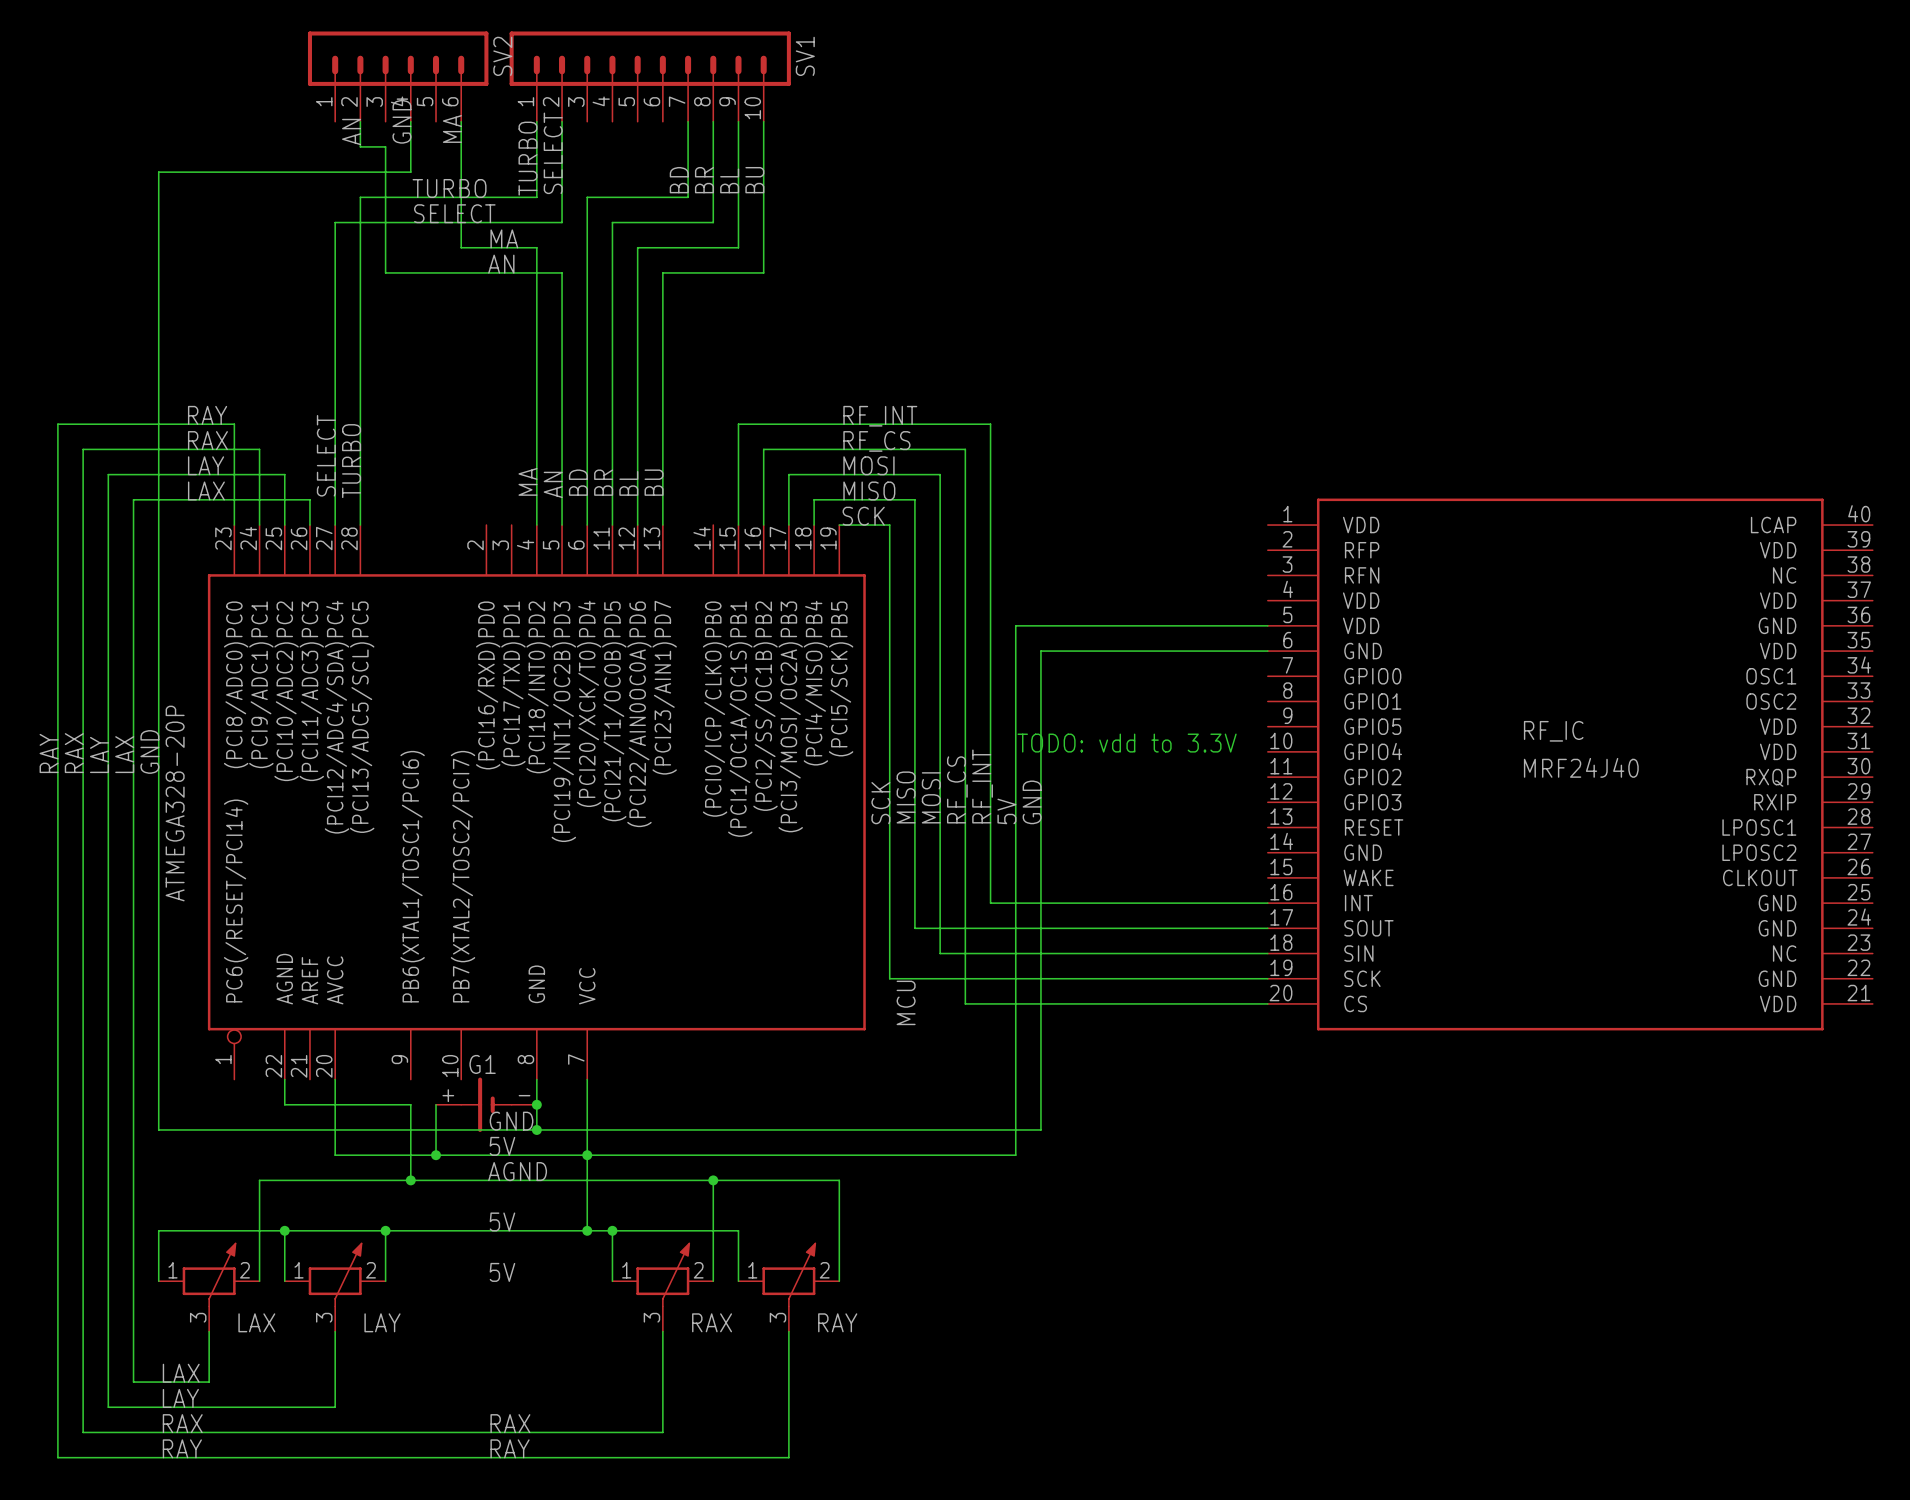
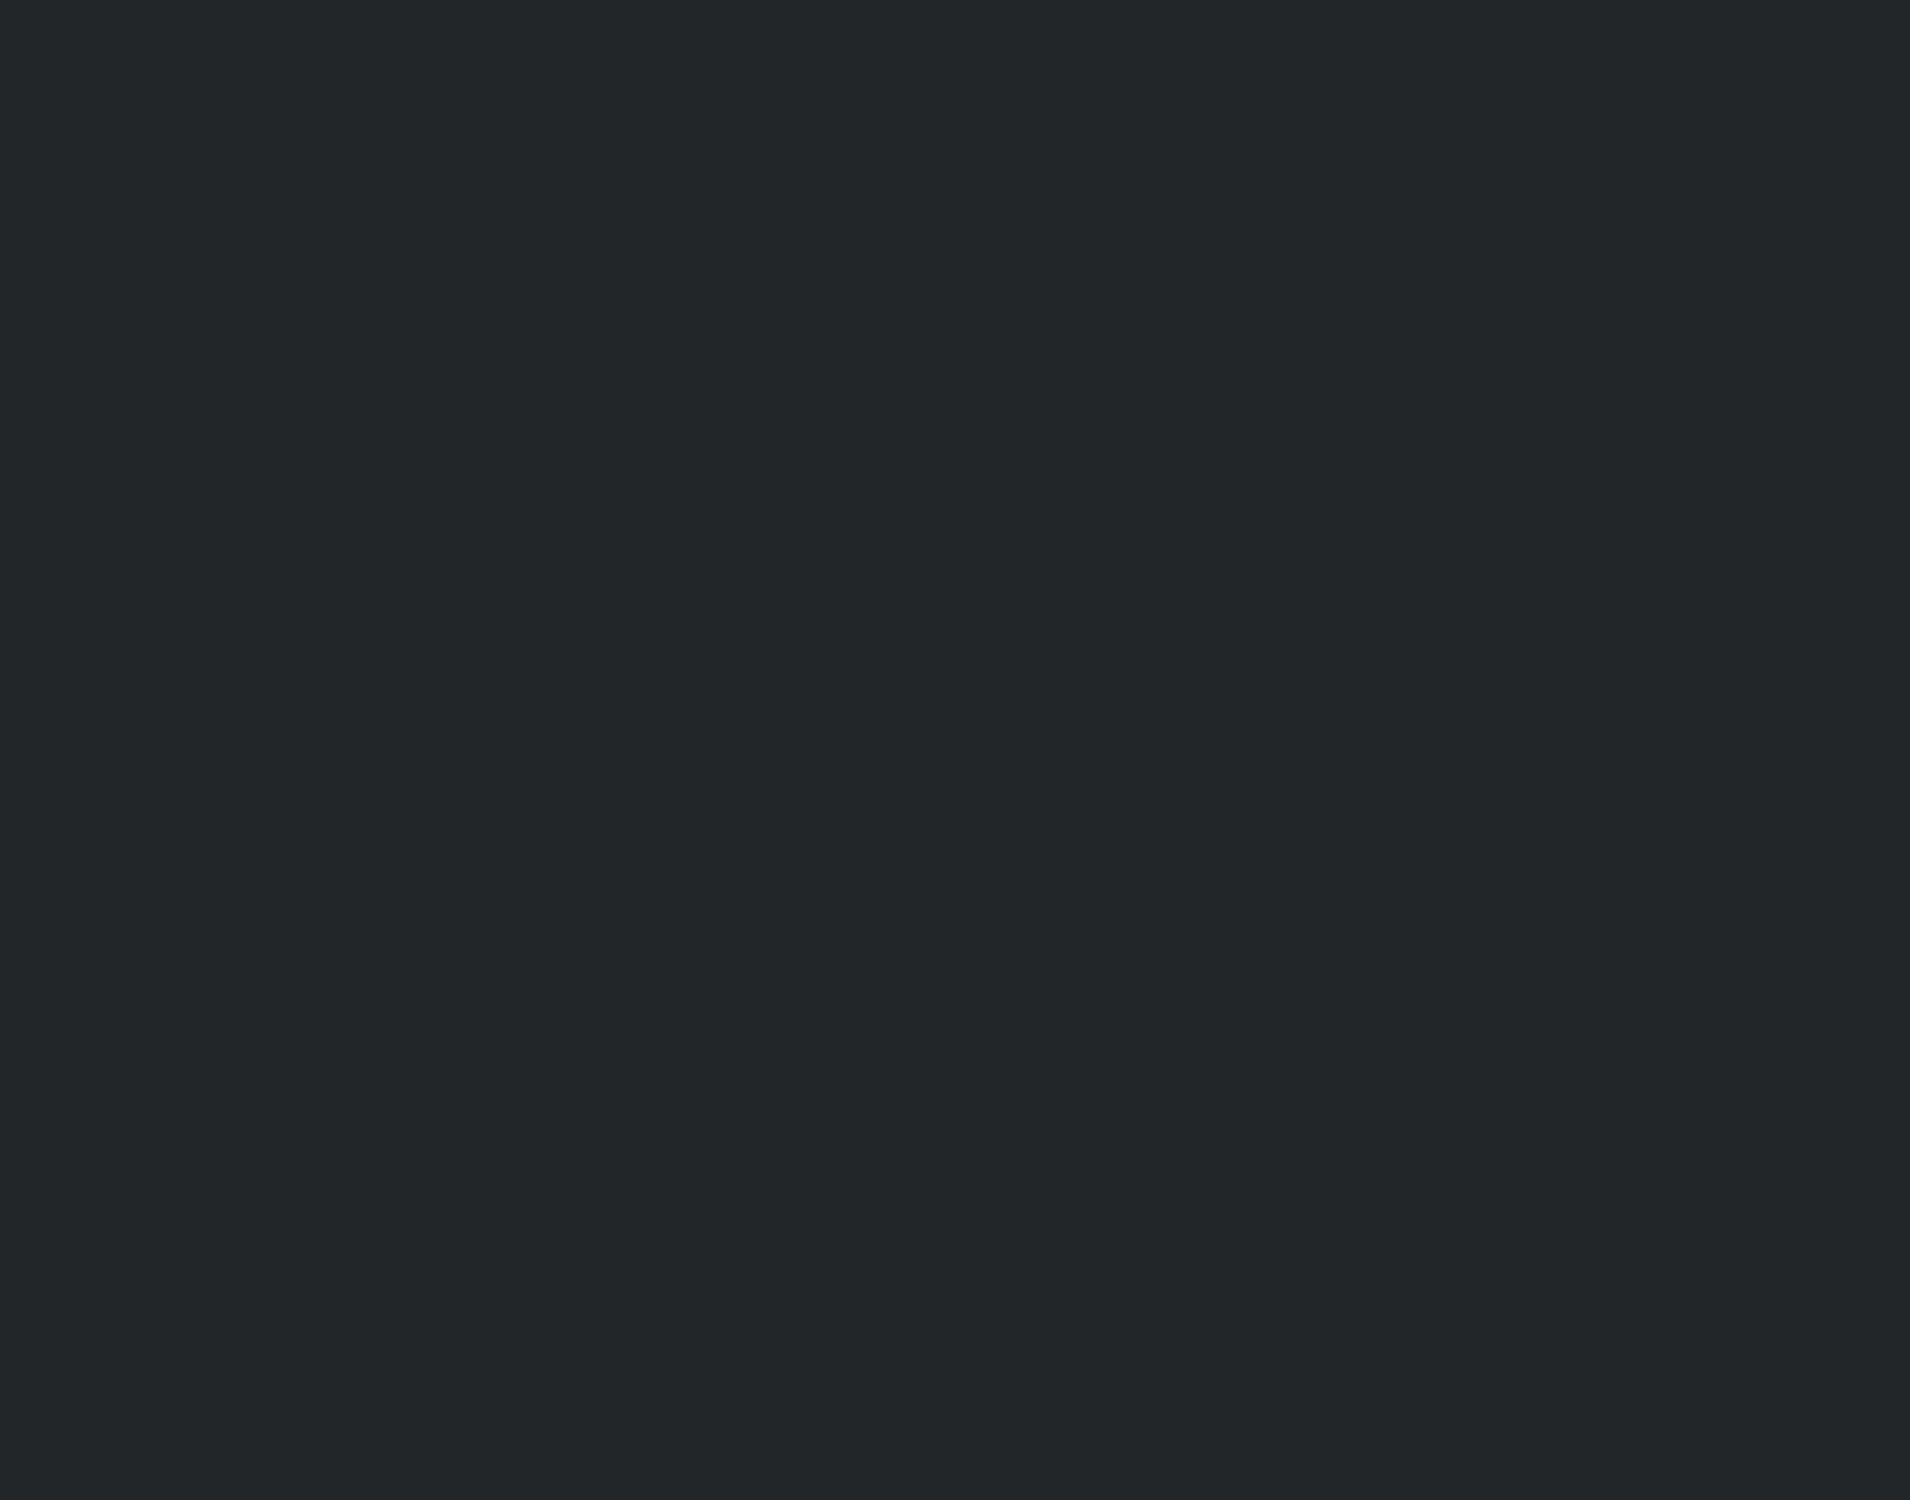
SV2: (398, 76) -> none
SV1: (650, 76) -> none
wire: (360, 121) (360, 146) (385, 146) (385, 272) (562, 272) (562, 525) -> none
label: GND (401, 121) -> none
wire: (410, 121) (410, 172) (158, 172) (158, 1129) (1040, 1129) (1040, 651) (1267, 651) -> none
wire: (461, 121) (461, 247) (536, 247) (536, 525) -> none
wire: (536, 121) (536, 197) (360, 197) (360, 525) -> none
wire: (562, 121) (562, 222) (335, 222) (335, 525) -> none
wire: (688, 121) (688, 197) (587, 197) (587, 525) -> none
wire: (713, 121) (713, 222) (612, 222) (612, 525) -> none
wire: (738, 121) (738, 247) (637, 247) (637, 525) -> none
wire: (763, 121) (763, 272) (662, 272) (662, 525) -> none
label: MA (452, 128) -> none
label: AN (351, 132) -> none
label: SELECT (553, 153) -> none
label: TURBO (528, 158) -> none
label: BD (679, 180) -> none
label: BR (704, 180) -> none
label: BL (729, 180) -> none
label: BU (754, 180) -> none
label: TURBO (449, 188) -> none
label: SELECT (454, 213) -> none
label: MA (504, 238) -> none
label: AN (501, 264) -> none
label: RAY (207, 415) -> none
label: RF_INT (880, 416) -> none
label: RAX (207, 440) -> none
label: RF_CS (876, 441) -> none
label: SELECT (326, 455) -> none
label: TURBO (351, 461) -> none
label: LAY (206, 465) -> none
label: MOSI (868, 465) -> none
label: MA (528, 481) -> none
label: BD (578, 482) -> none
label: BR (603, 482) -> none
label: BU (654, 482) -> none
label: BL (628, 483) -> none
label: AN (553, 484) -> none
label: LAX (206, 491) -> none
label: MISO (869, 491) -> none
label: SCK (863, 516) -> none
wire: (234, 525) (234, 424) (57, 424) (57, 1457) (788, 1457) (788, 1331) -> none
wire: (259, 525) (259, 449) (83, 449) (83, 1432) (662, 1432) (662, 1331) -> none
wire: (284, 525) (284, 474) (108, 474) (108, 1407) (335, 1407) (335, 1331) -> none
wire: (309, 525) (309, 499) (133, 499) (133, 1382) (209, 1382) (209, 1331) -> none
wire: (738, 525) (738, 424) (990, 424) (990, 903) (1267, 903) -> none
wire: (763, 525) (763, 449) (965, 449) (965, 1003) (1267, 1003) -> none
wire: (788, 525) (788, 474) (940, 474) (940, 953) (1267, 953) -> none
wire: (814, 525) (814, 499) (914, 499) (914, 928) (1267, 928) -> none
wire: (839, 525) (889, 525) (889, 978) (1267, 978) -> none
wire: (1267, 625) (1015, 625) (1015, 1155) (335, 1155) (335, 1079) -> none
text: TODO: vdd to 3.3V (1127, 743) -> none
label: GND (149, 751) -> none
label: RAY (49, 753) -> none
label: RAX (74, 753) -> none
label: LAY (99, 754) -> none
label: LAX (124, 754) -> none
RF_IC: MRF24J40 (1570, 764) -> none
label: RF_INT (982, 786) -> none
label: RF_CS (957, 789) -> none
label: MISO (906, 797) -> none
label: MOSI (931, 797) -> none
MCU: ATMEGA328-20P (536, 802) -> none
label: GND (1032, 802) -> none
label: SCK (880, 803) -> none
label: 5V (1006, 811) -> none
wire: (284, 1079) (284, 1104) (410, 1104) (410, 1180) -> none
wire: (536, 1079) (536, 1129) -> none
wire: (587, 1079) (587, 1230) -> none
wire: (436, 1104) (436, 1155) -> none
G1: (486, 1104) -> none
junction: (536, 1104) -> none
label: GND (511, 1121) -> none
junction: (536, 1129) -> none
label: 5V (502, 1146) -> none
junction: (436, 1155) -> none
junction: (587, 1155) -> none
label: AGND (517, 1171) -> none
junction: (410, 1180) -> none
wire: (713, 1180) (713, 1281) -> none
junction: (713, 1180) -> none
label: 5V (502, 1221) -> none
wire: (284, 1230) (284, 1281) -> none
junction: (284, 1230) -> none
wire: (385, 1230) (385, 1281) -> none
junction: (385, 1230) -> none
junction: (587, 1230) -> none
wire: (612, 1230) (612, 1281) -> none
junction: (612, 1230) -> none
label: 5V (502, 1272) -> none
wire: (158, 1281) (158, 1230) (738, 1230) (738, 1281) -> none
wire: (259, 1281) (259, 1180) (839, 1180) (839, 1281) -> none
LAX: (209, 1287) -> none
LAY: (335, 1287) -> none
RAX: (662, 1287) -> none
RAY: (788, 1287) -> none
label: LAX (181, 1373) -> none
label: LAY (180, 1398) -> none
label: RAX (182, 1423) -> none
label: RAX (510, 1423) -> none
label: RAY (182, 1448) -> none
label: RAY (510, 1448) -> none

